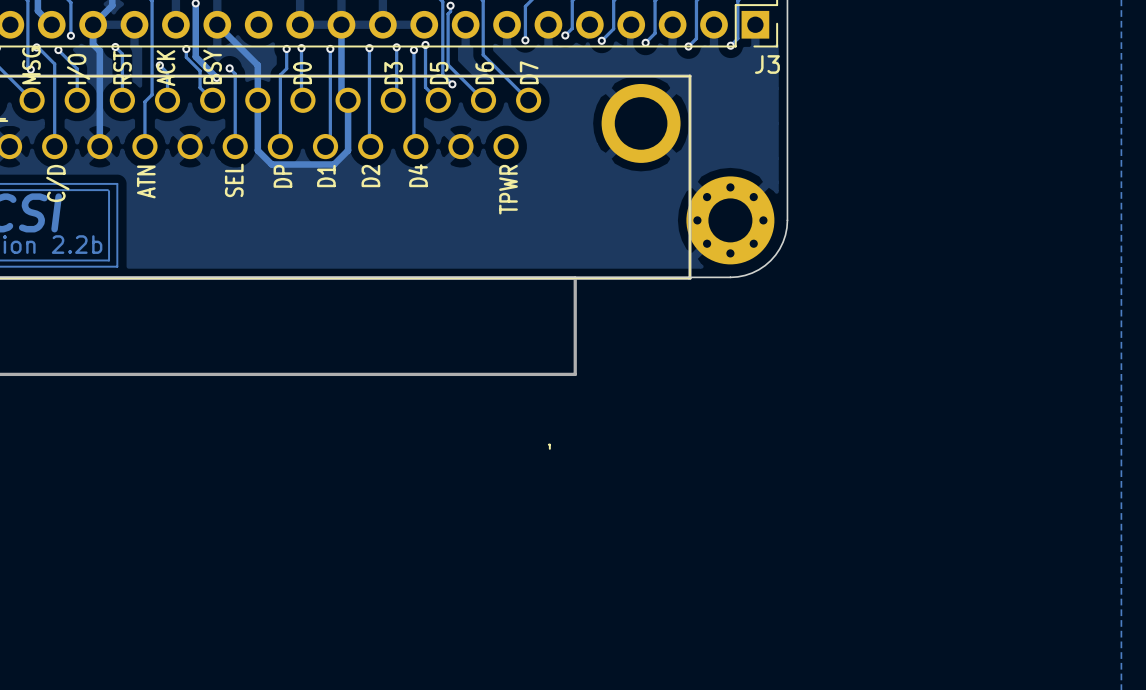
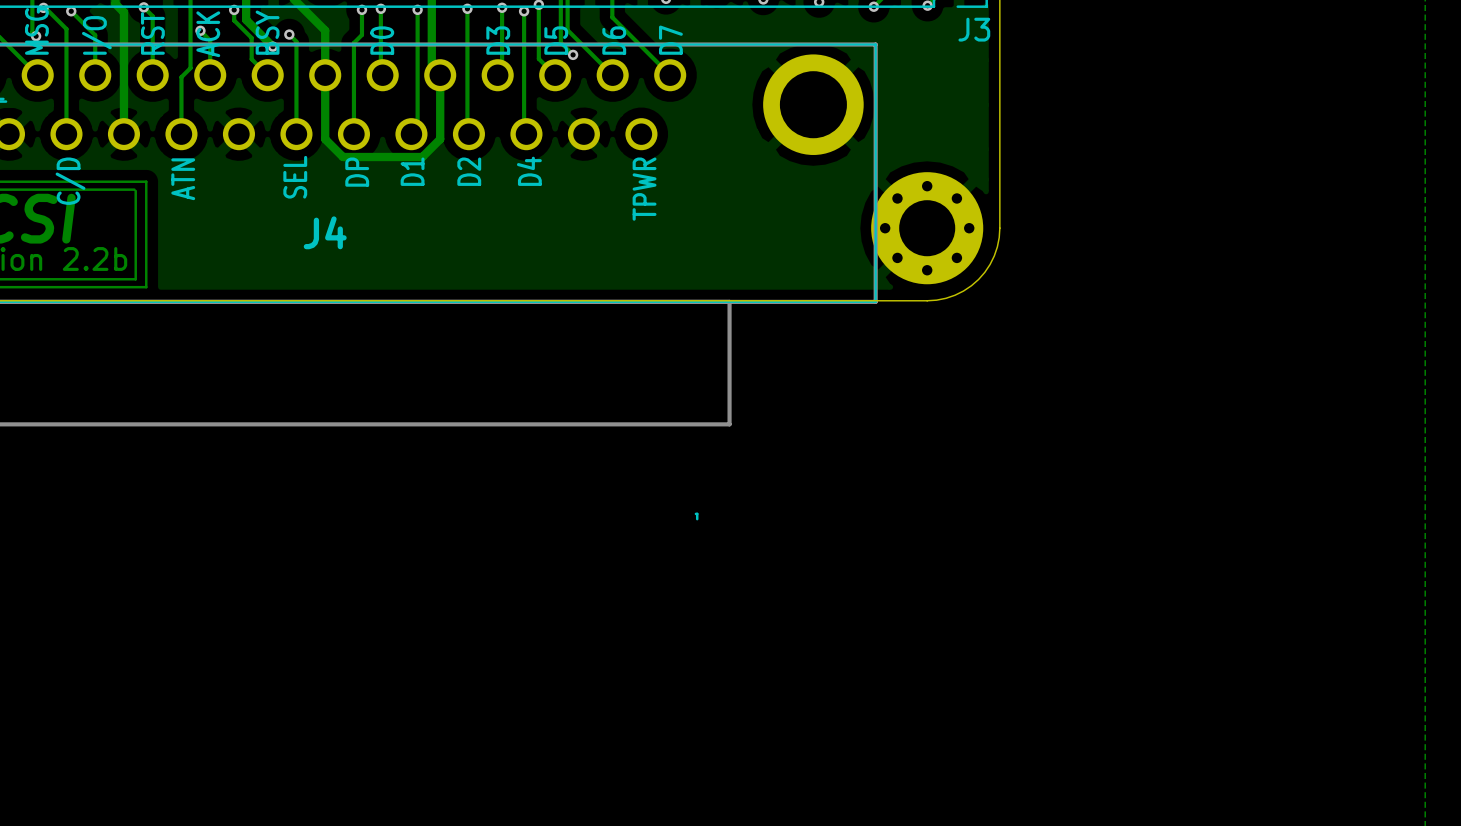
J4 name: none -> J4 (325, 232)

